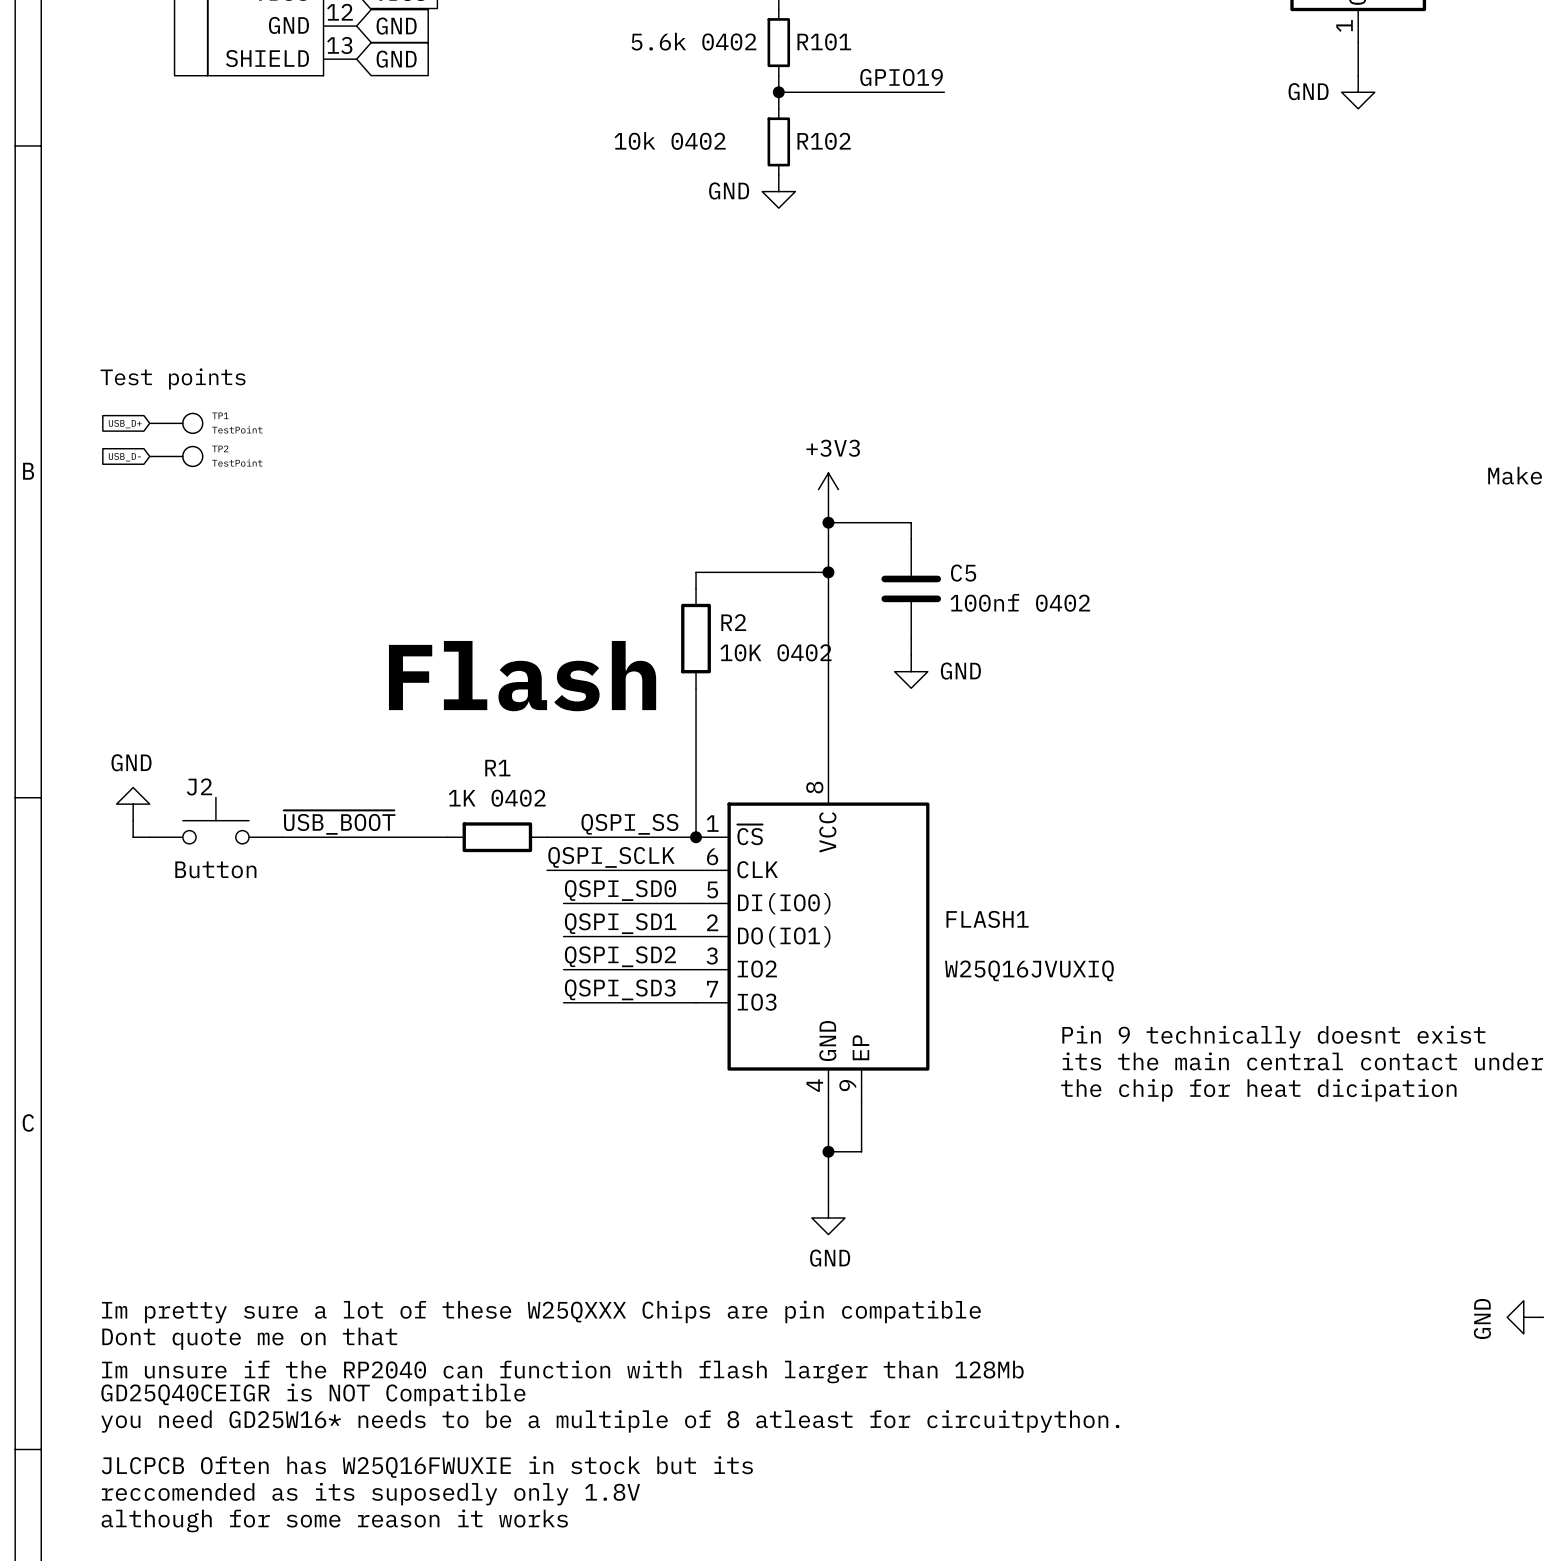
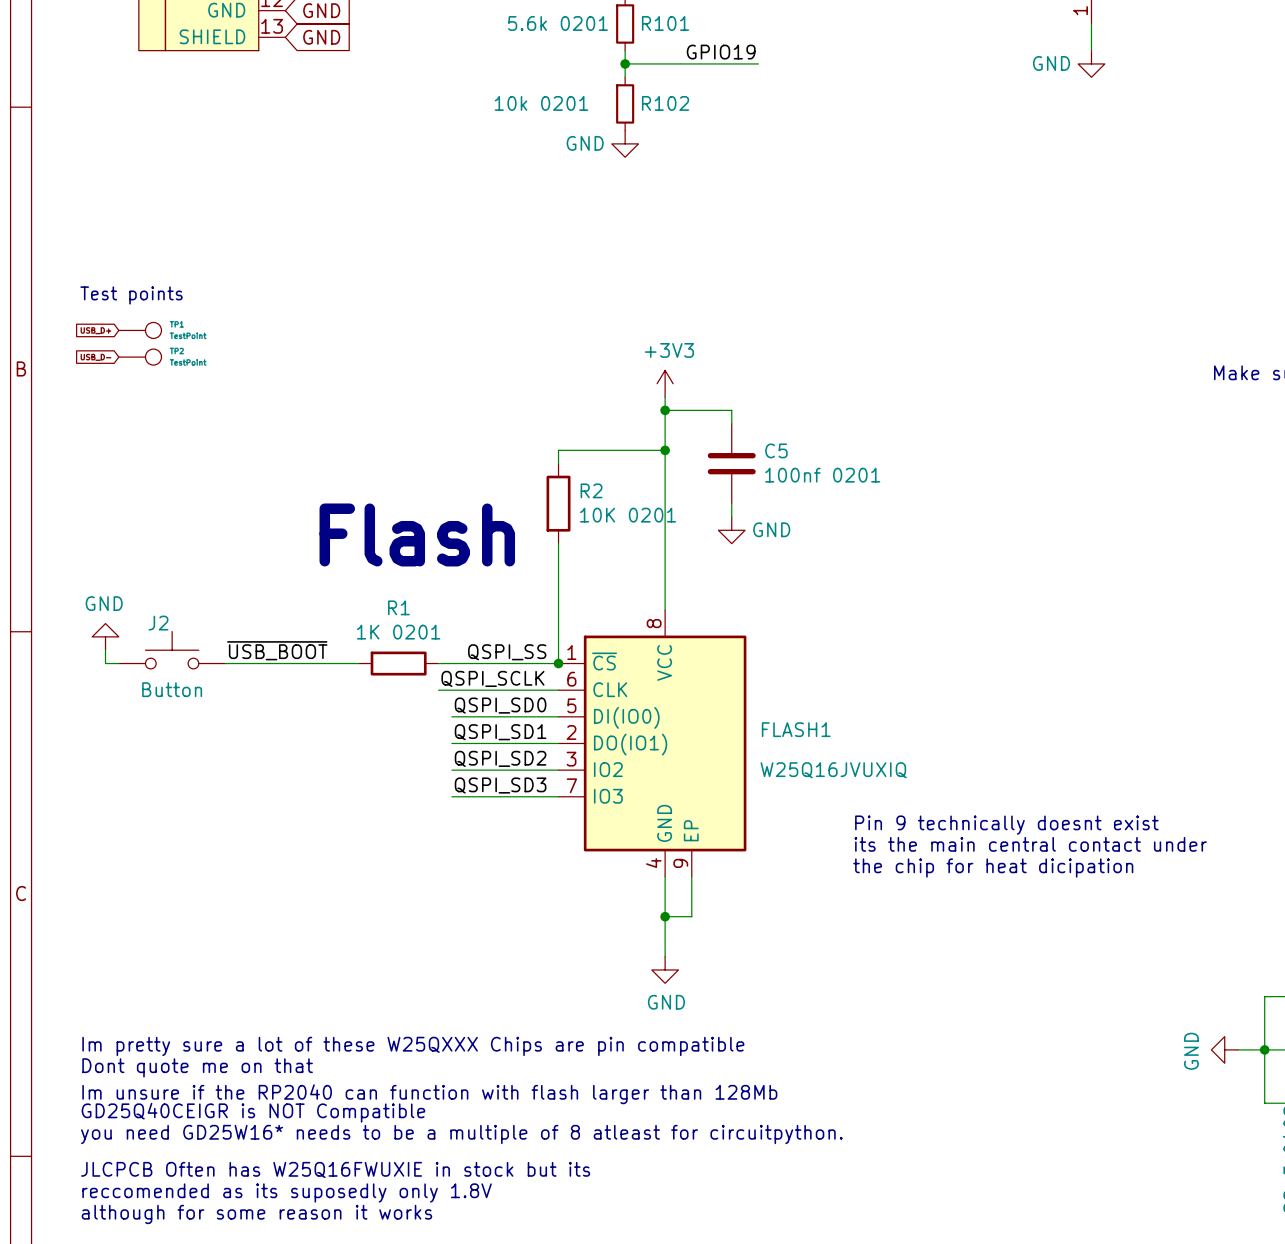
R101 value: 5.6k 0402 (693, 41) -> 5.6k 0201 (557, 23)
R102 value: 10k 0402 (670, 140) -> 10k 0201 (541, 103)
C5 value: 100nf 0402 (1020, 602) -> 100nf 0201 (822, 475)
R2 value: 10K 0402 (776, 652) -> 10K 0201 (628, 515)
R1 value: 1K 0402 (497, 798) -> 1K 0201 (398, 632)

